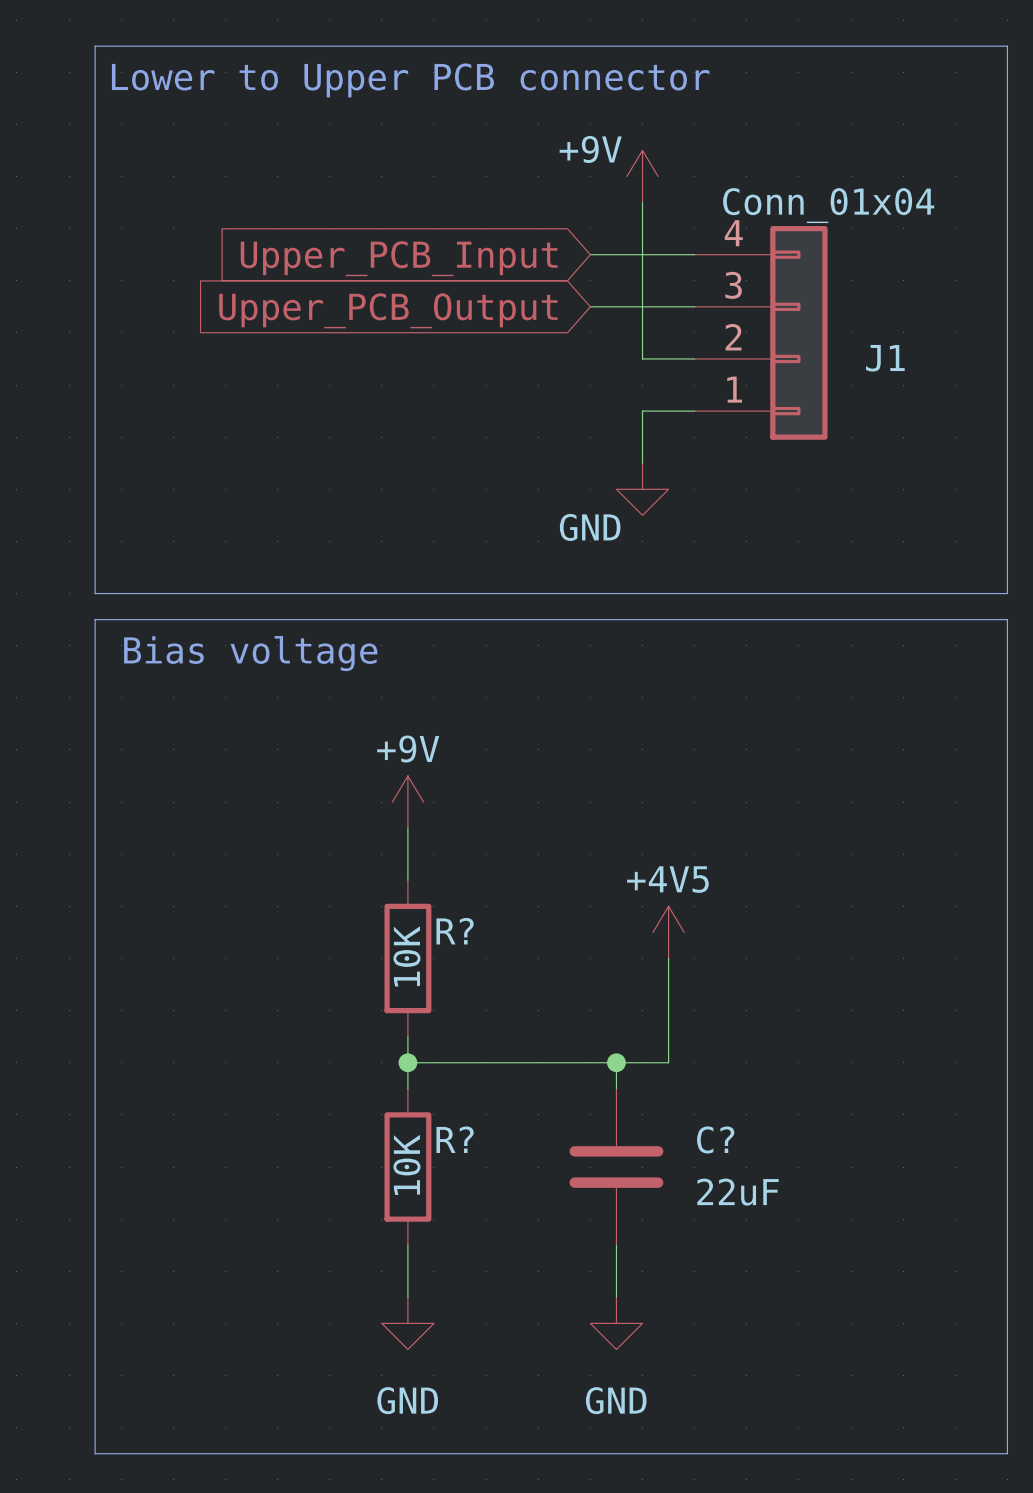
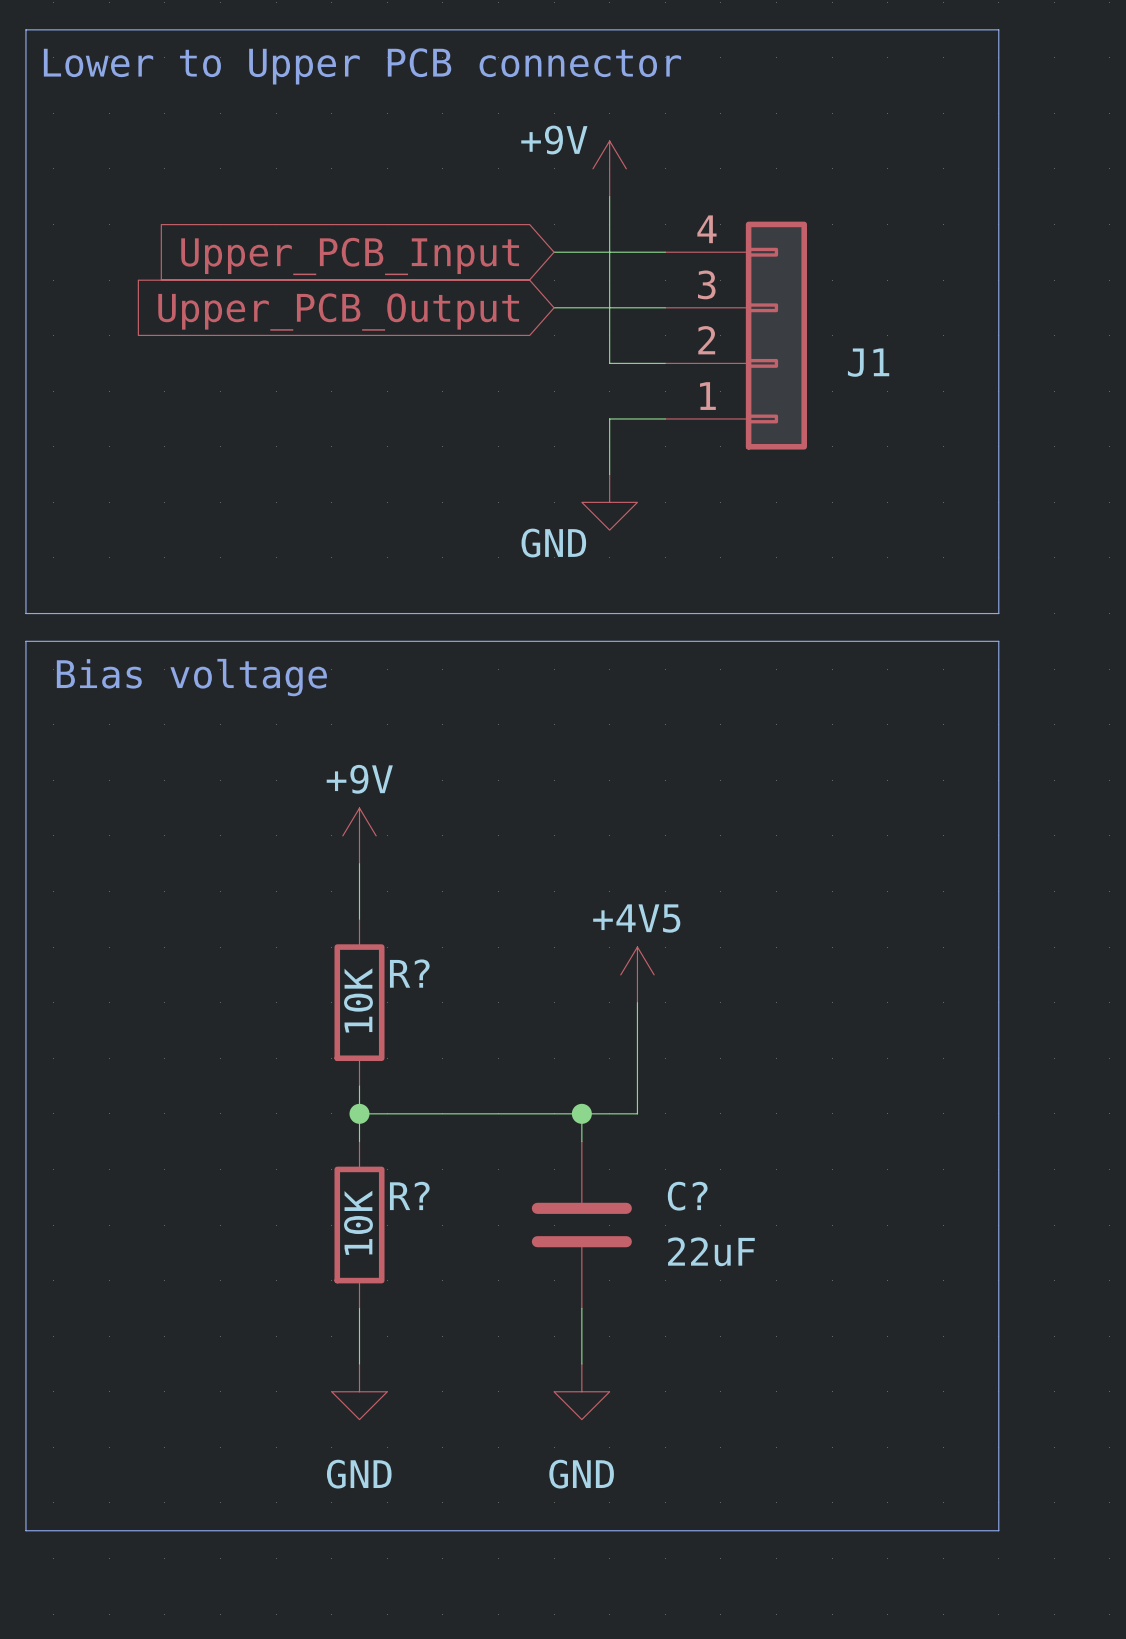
J1 value: Conn_01x04 (828, 205) -> none

